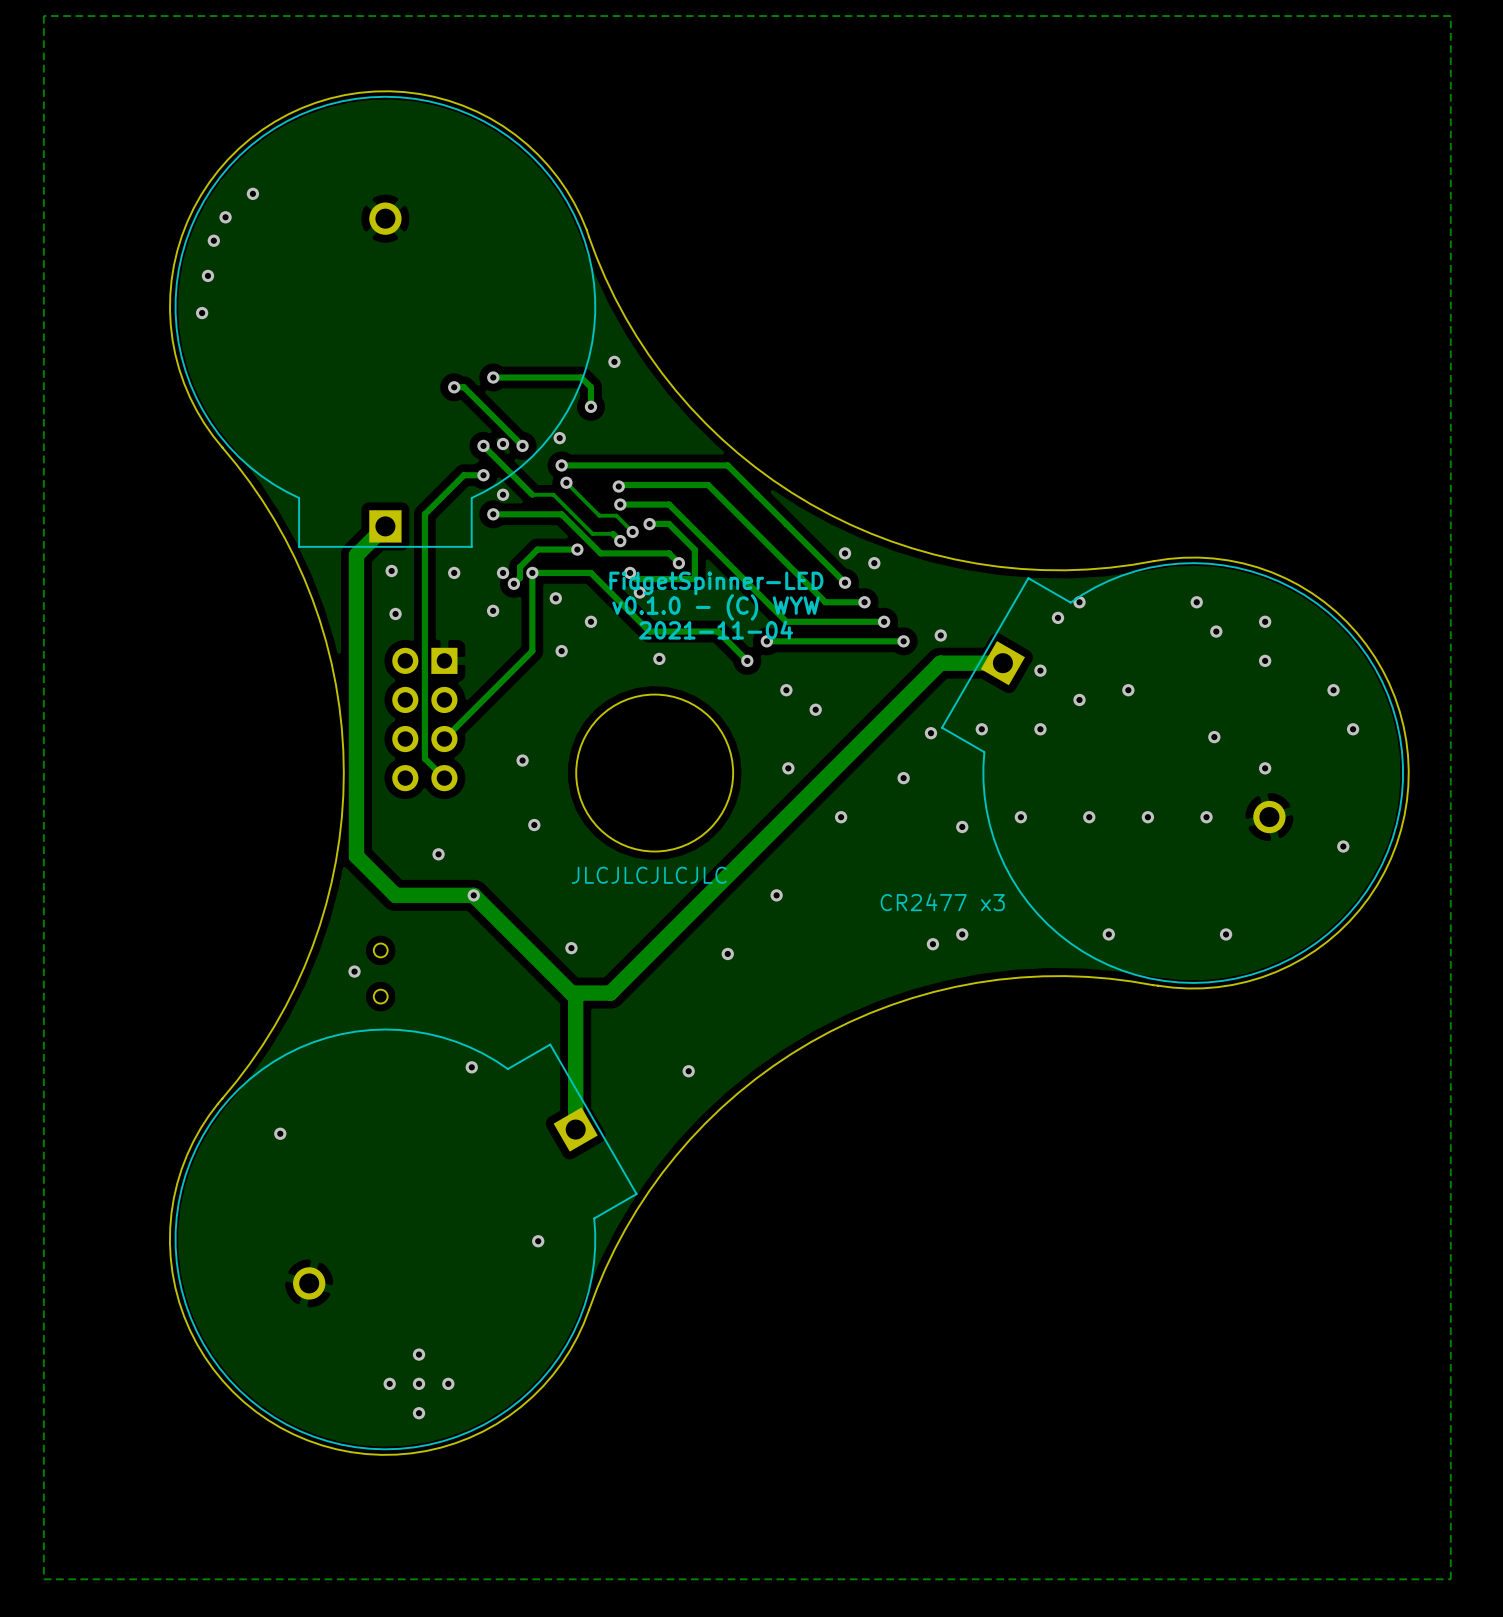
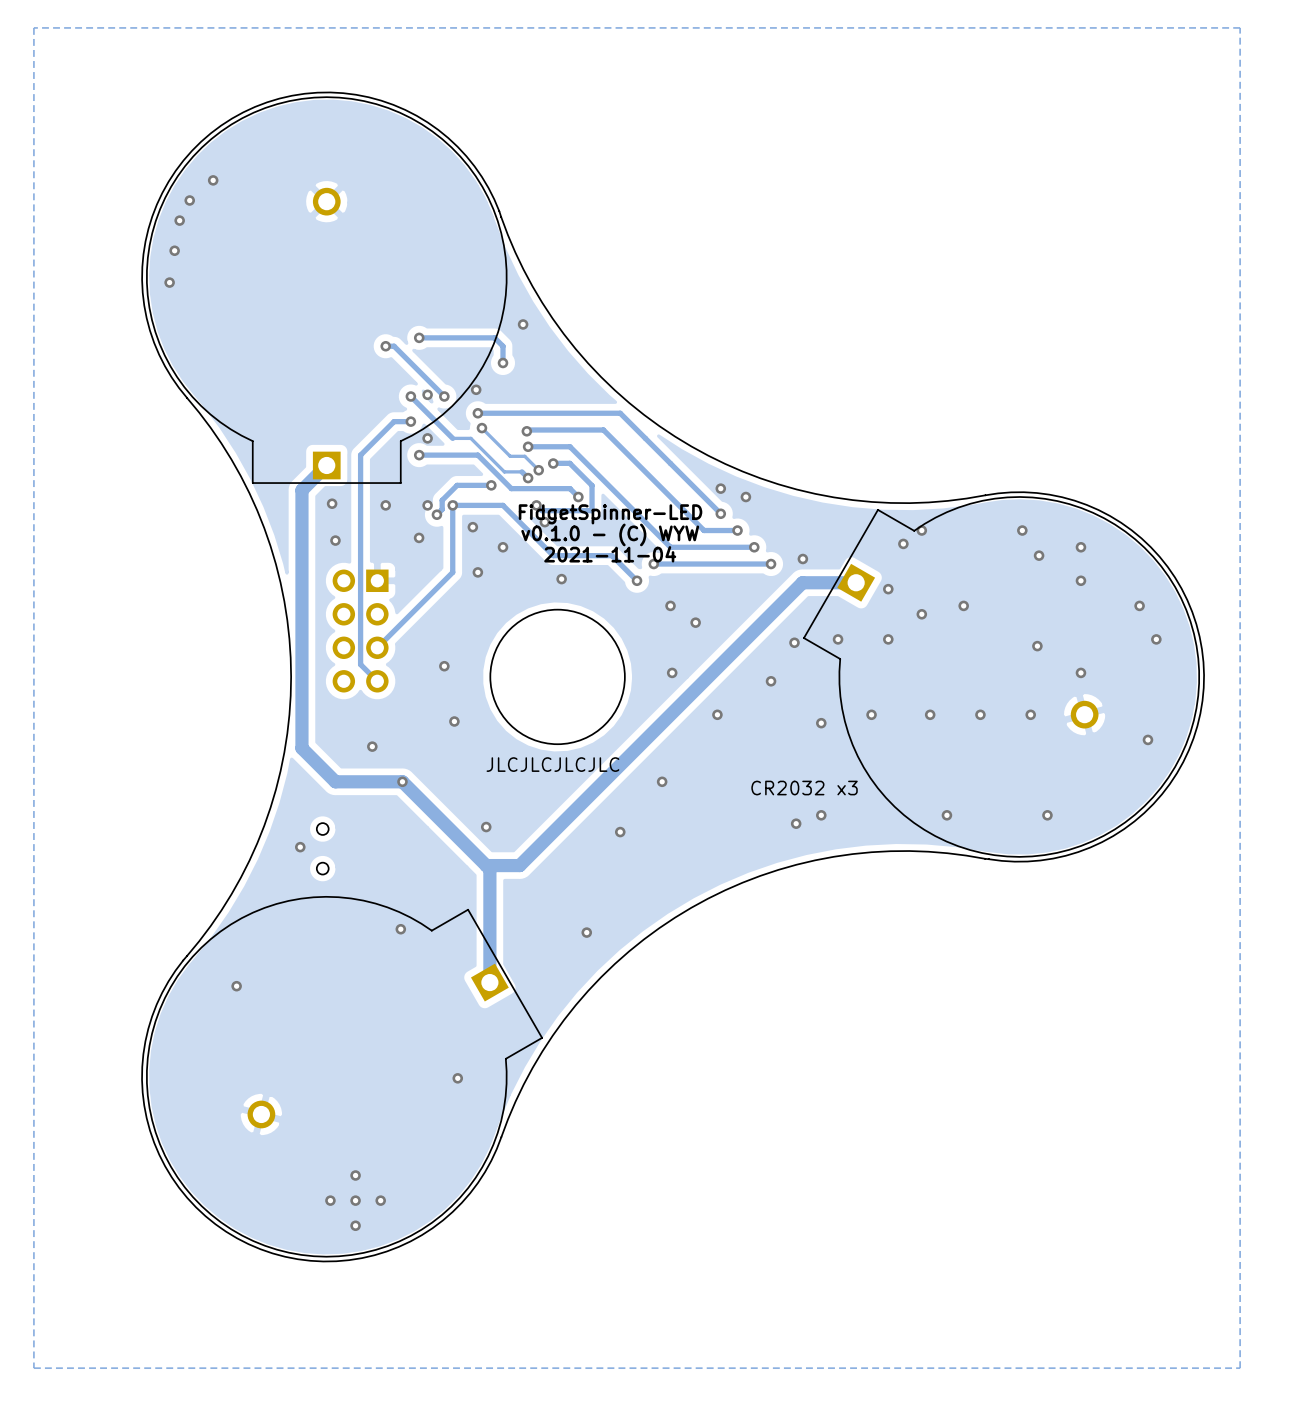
text: CR2477 x3 (942, 902) -> CR2032 x3 (804, 788)

